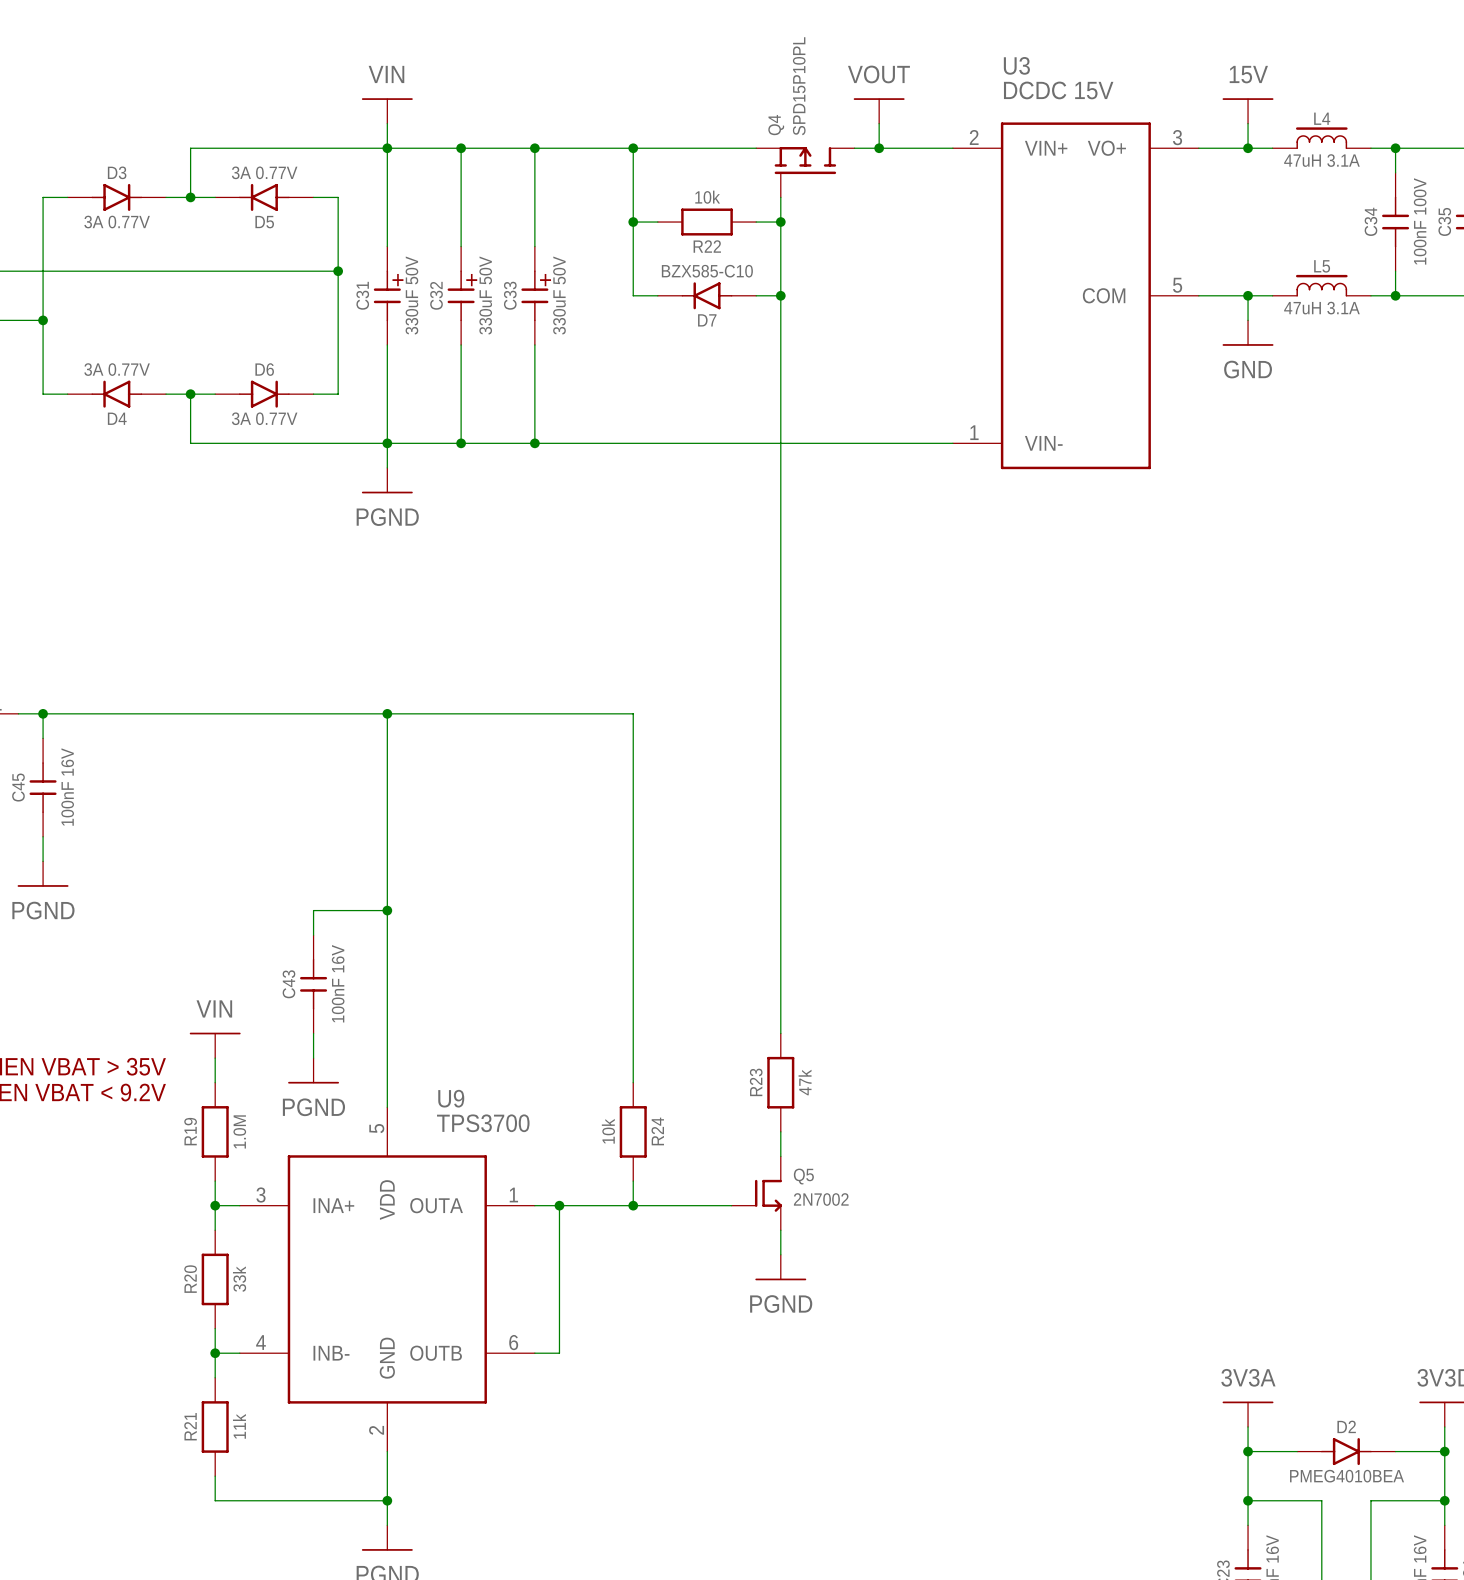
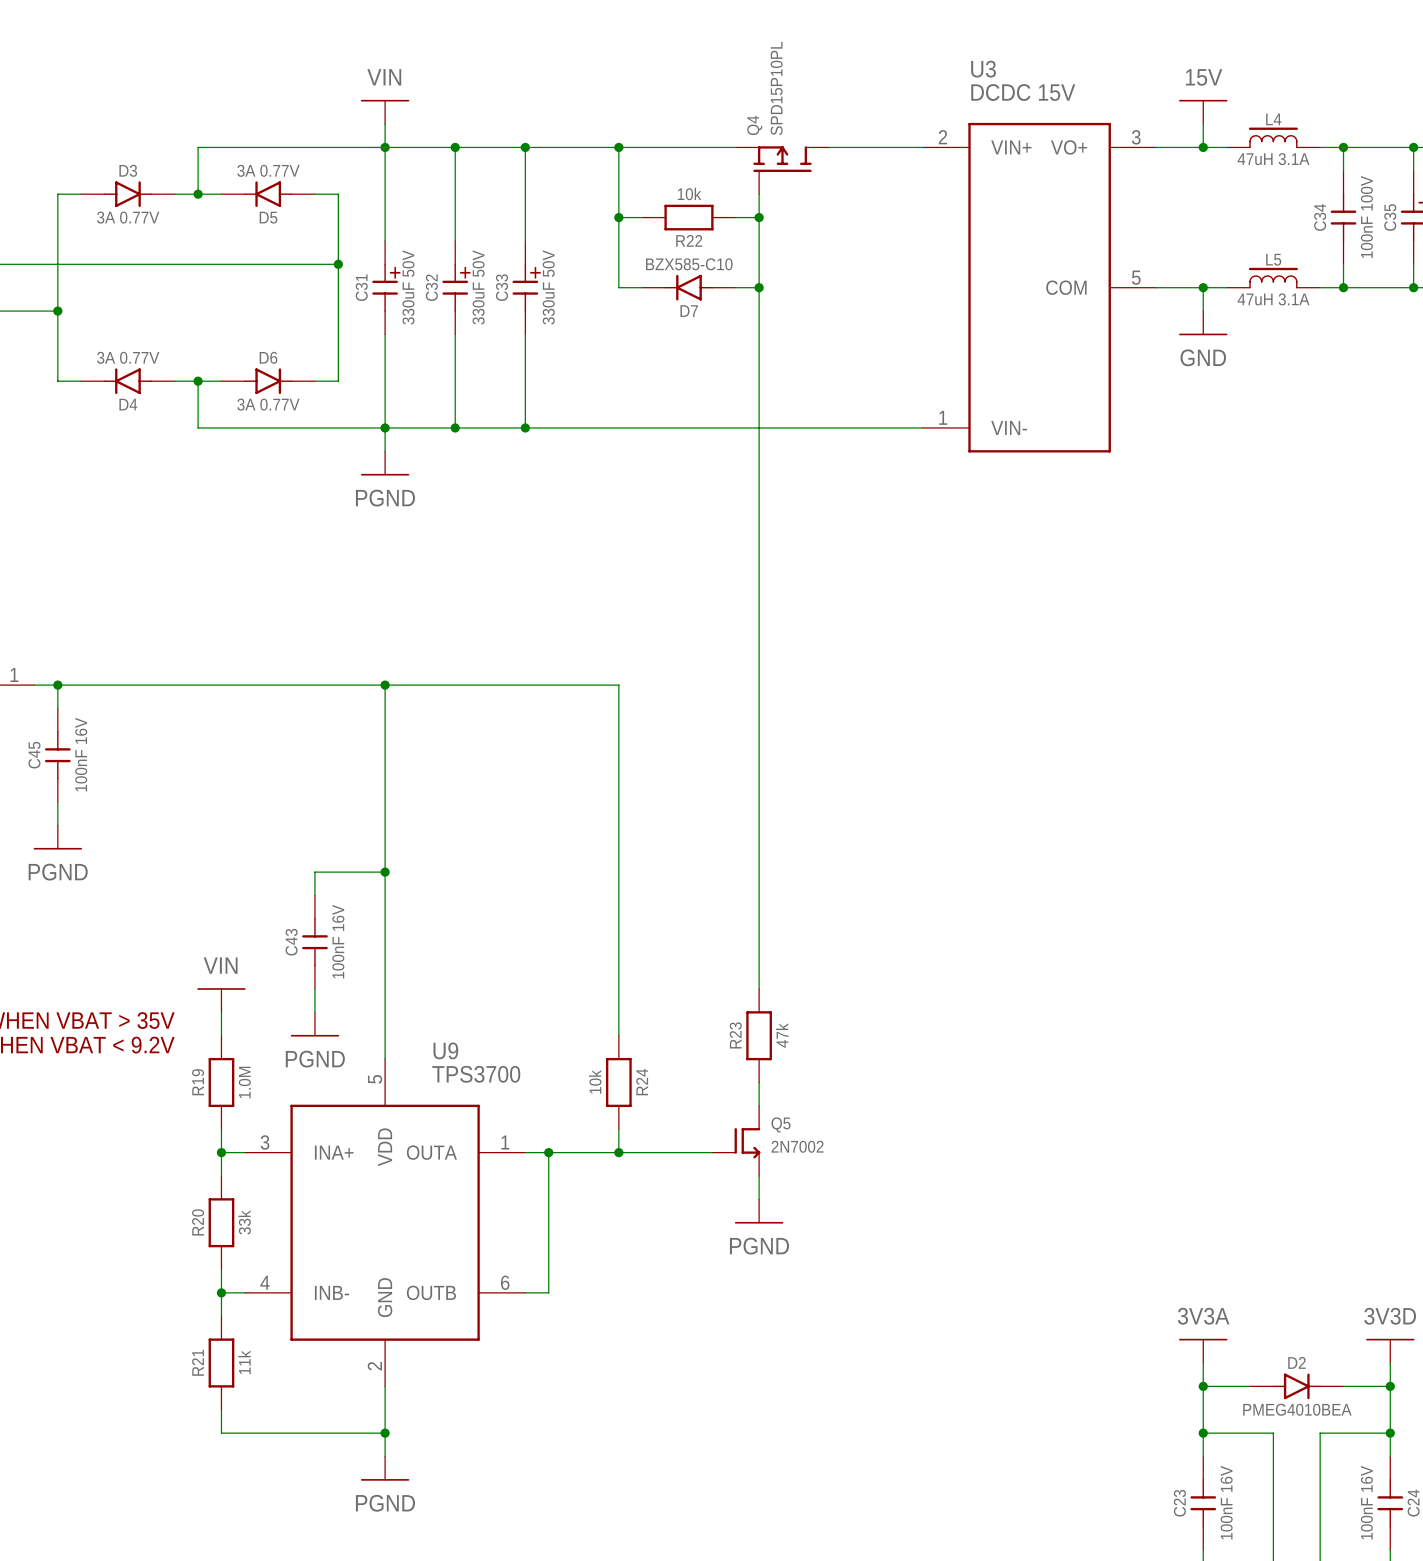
power symbol: VOUT (879, 110) -> none
wire: (879, 123) (879, 148) -> none
junction: (879, 148) -> none

